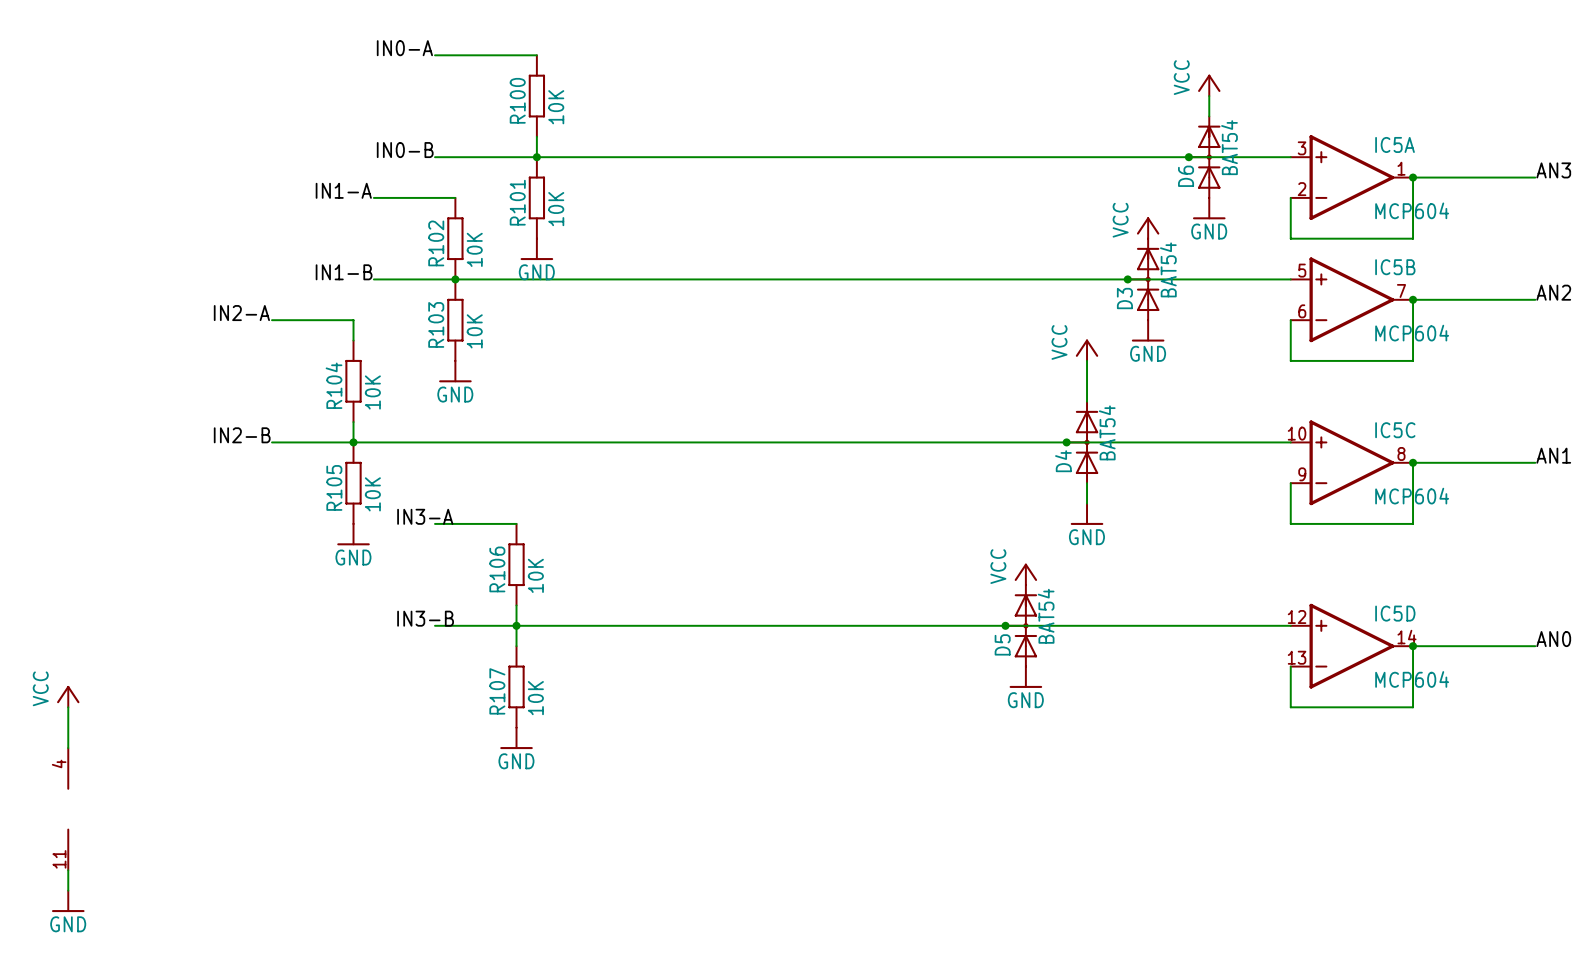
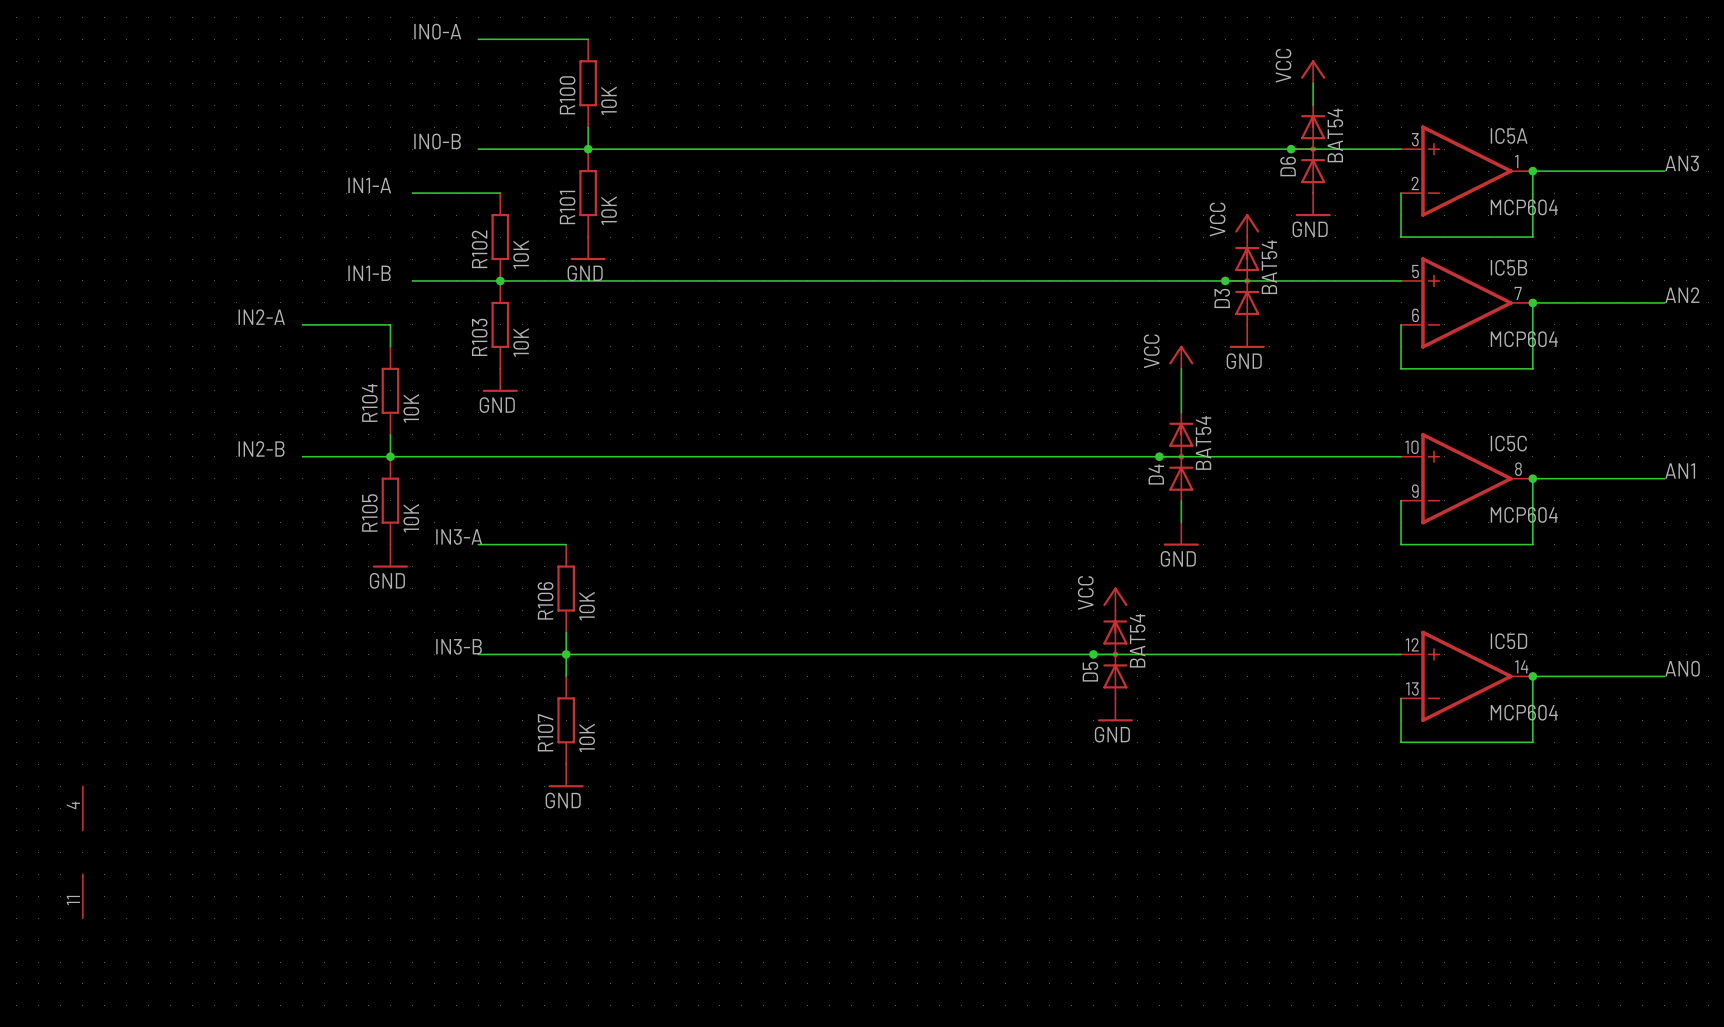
power symbol: VCC (68, 696) -> none
wire: (68, 707) (68, 748) -> none
wire: (68, 870) (68, 890) -> none
power symbol: GND (68, 901) -> none

